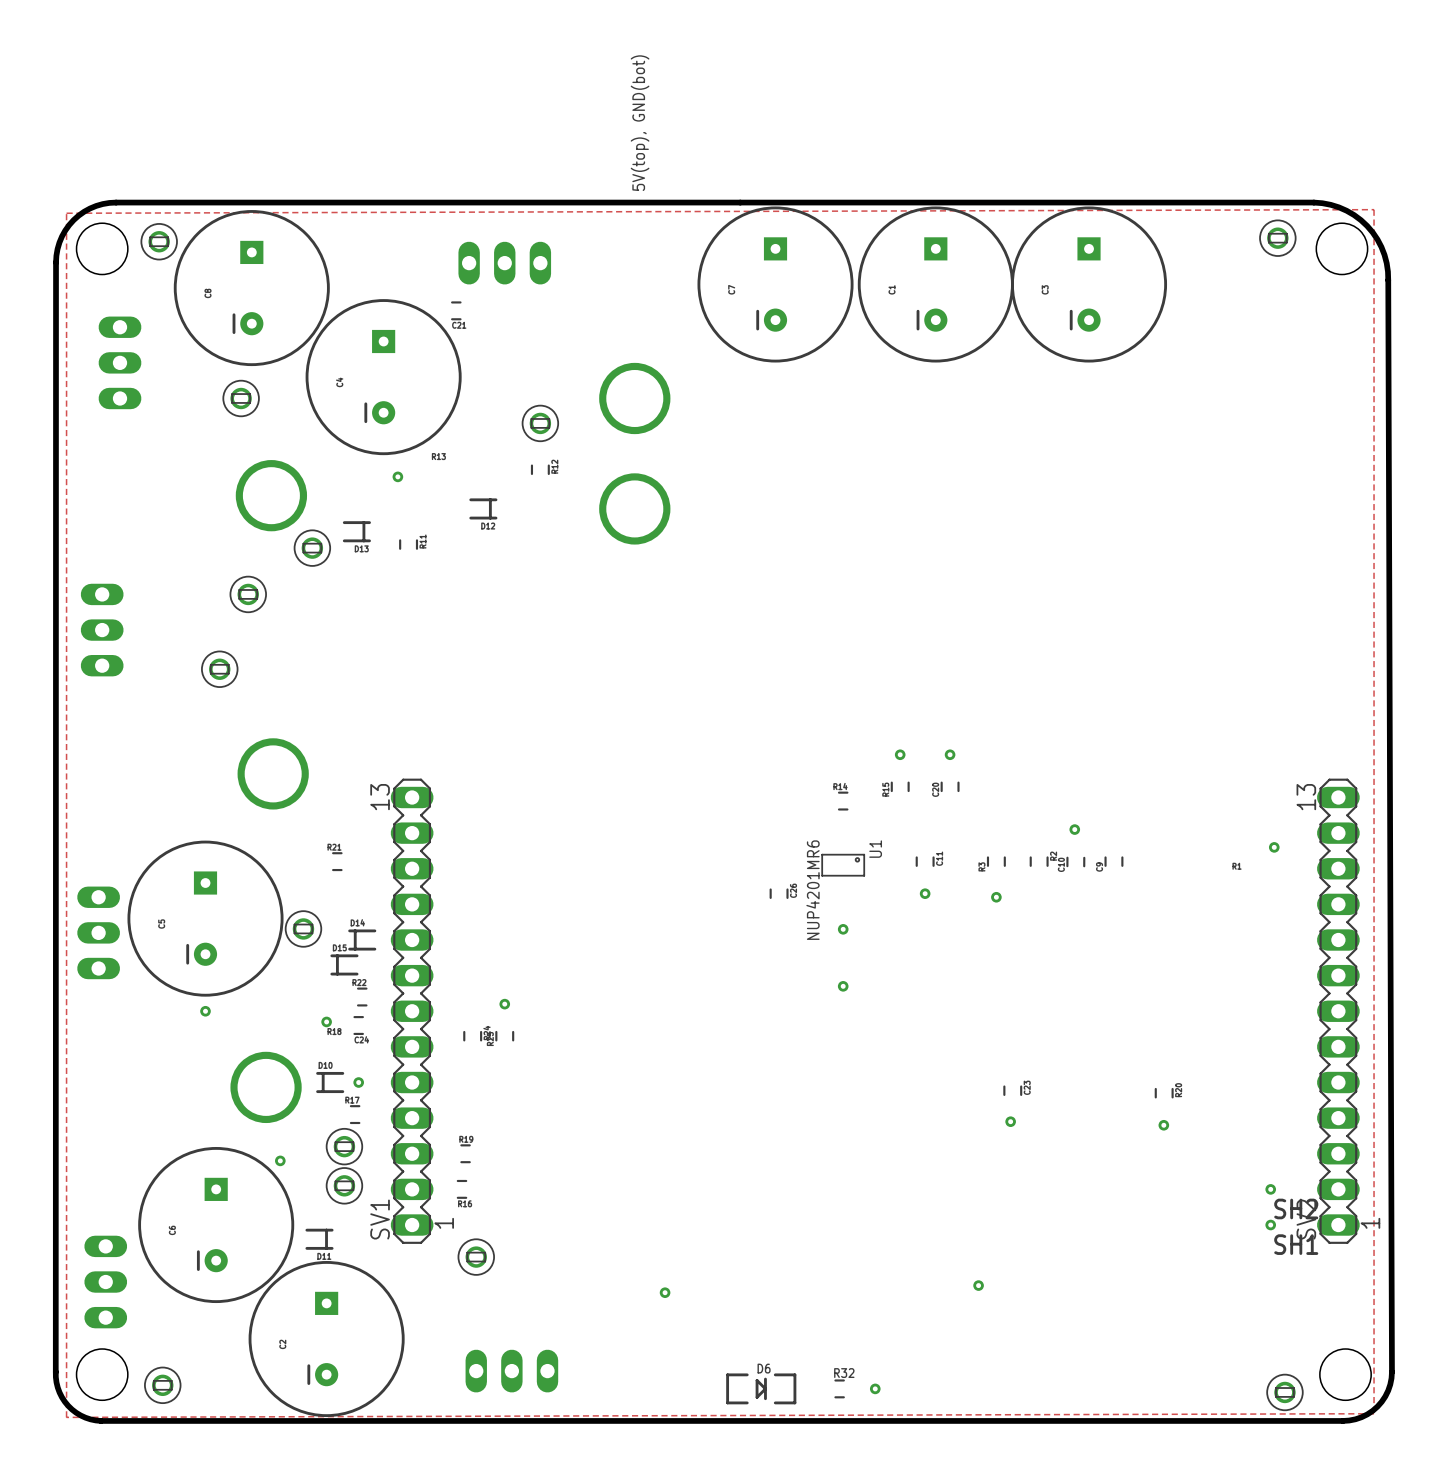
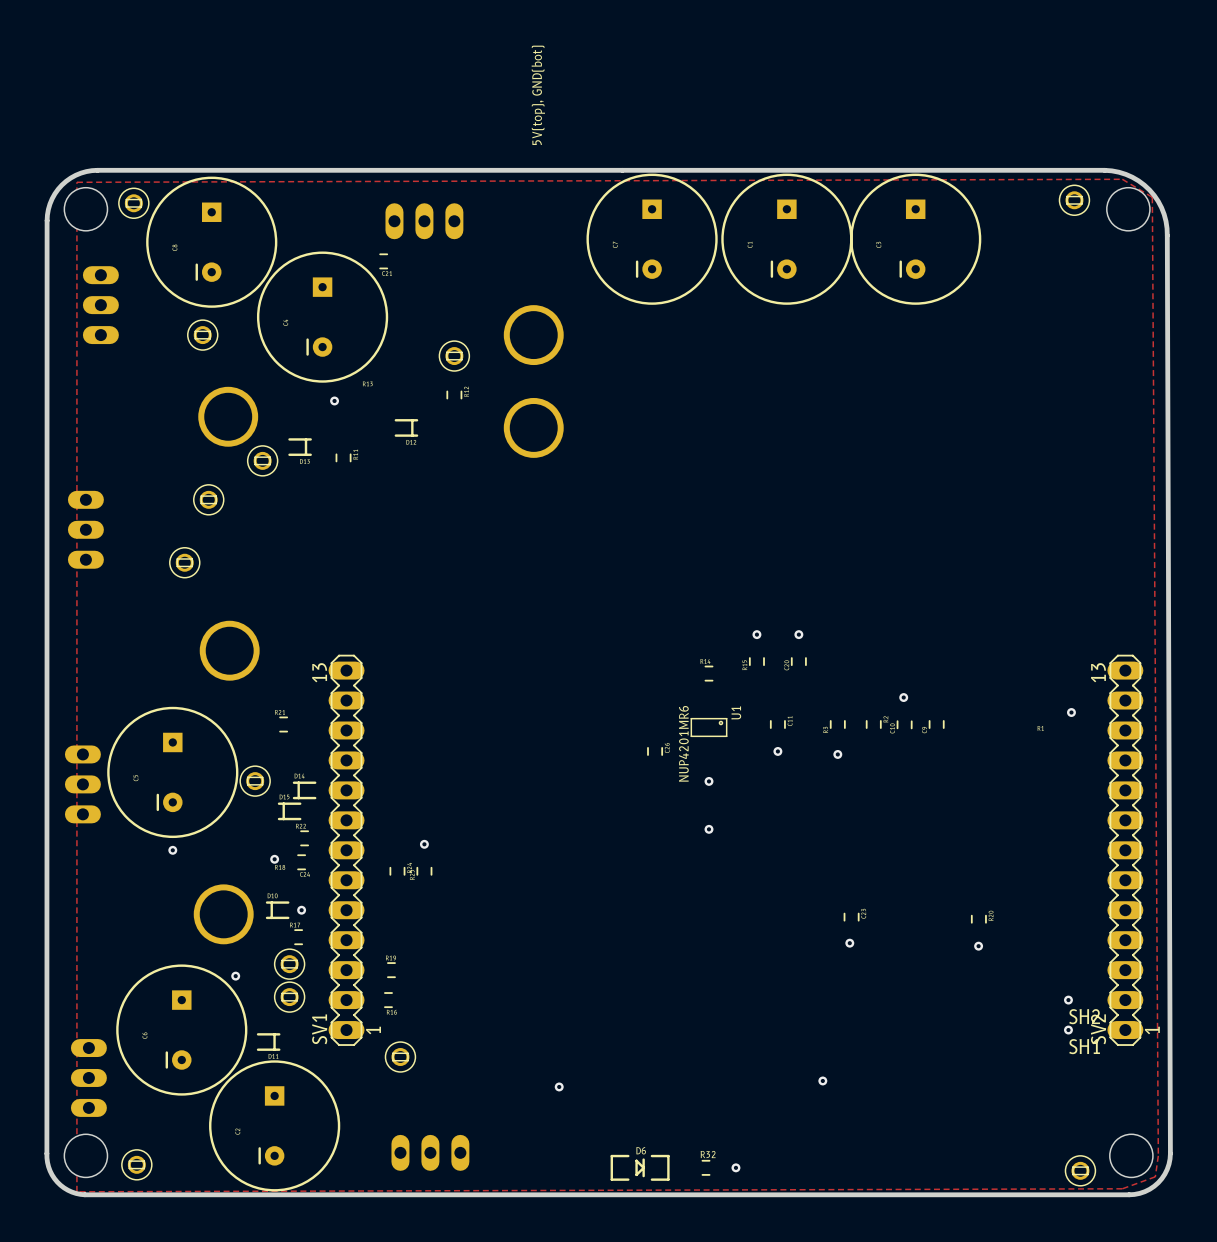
zone outline: (1334, 1413) (1374, 1413) (1374, 209) (66, 213) (66, 1417) (91, 1417) -> (1122, 1188) (1155, 1176) (1158, 1155) (1152, 197) (1122, 179) (76, 182) (76, 1191)

